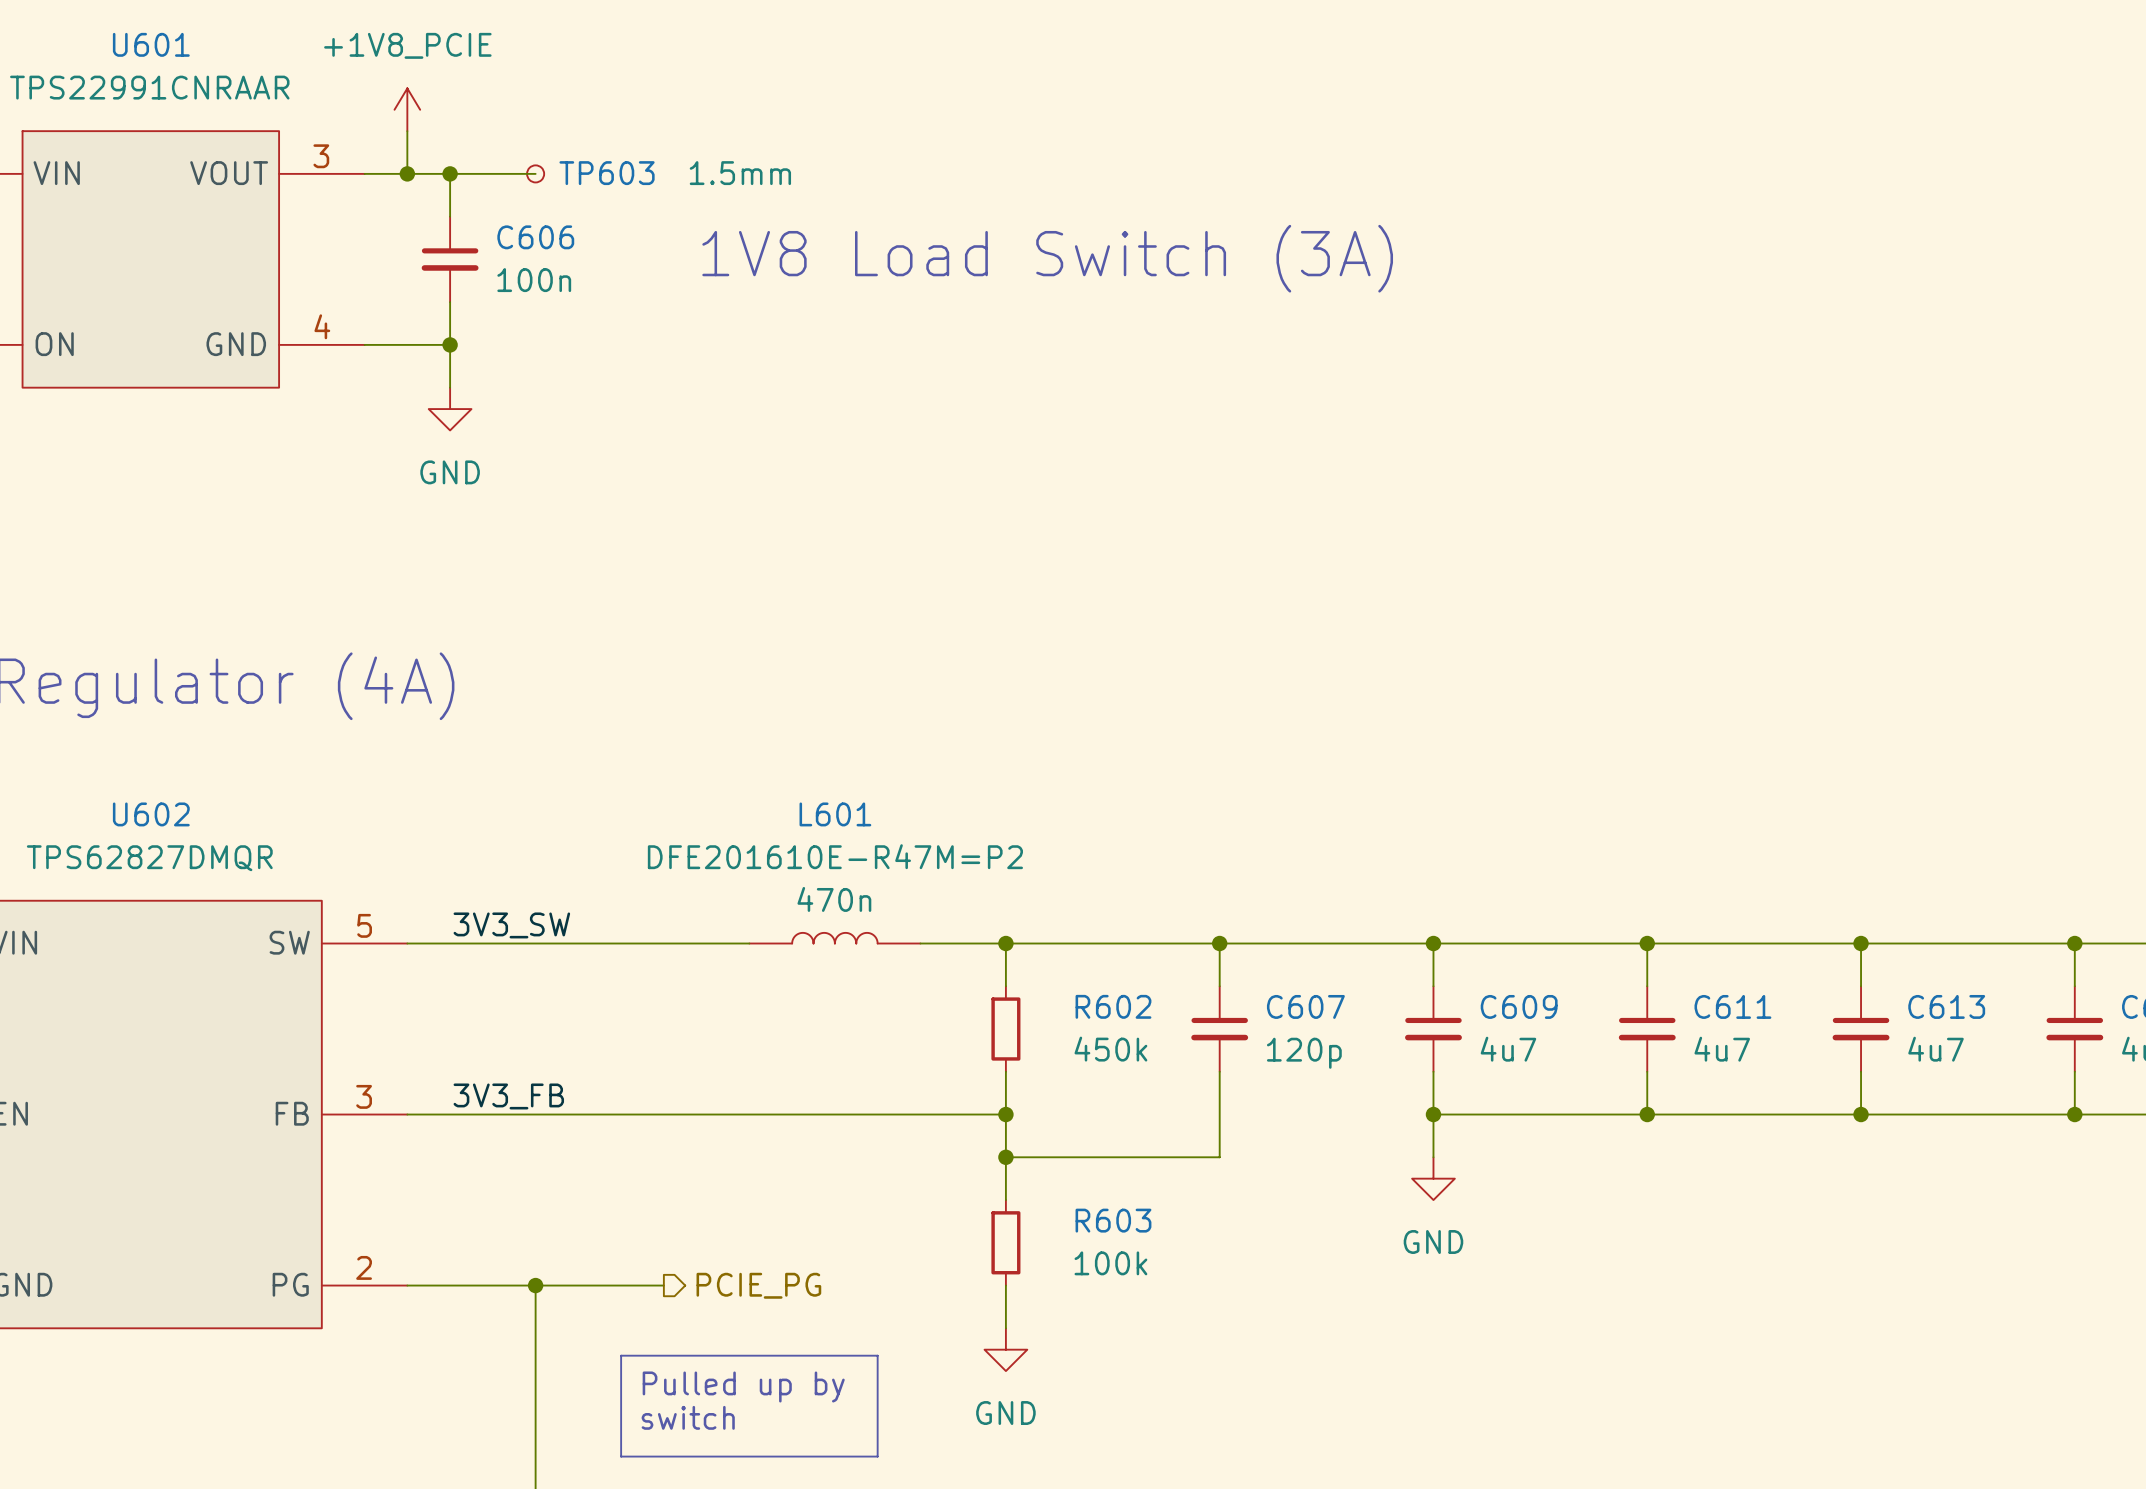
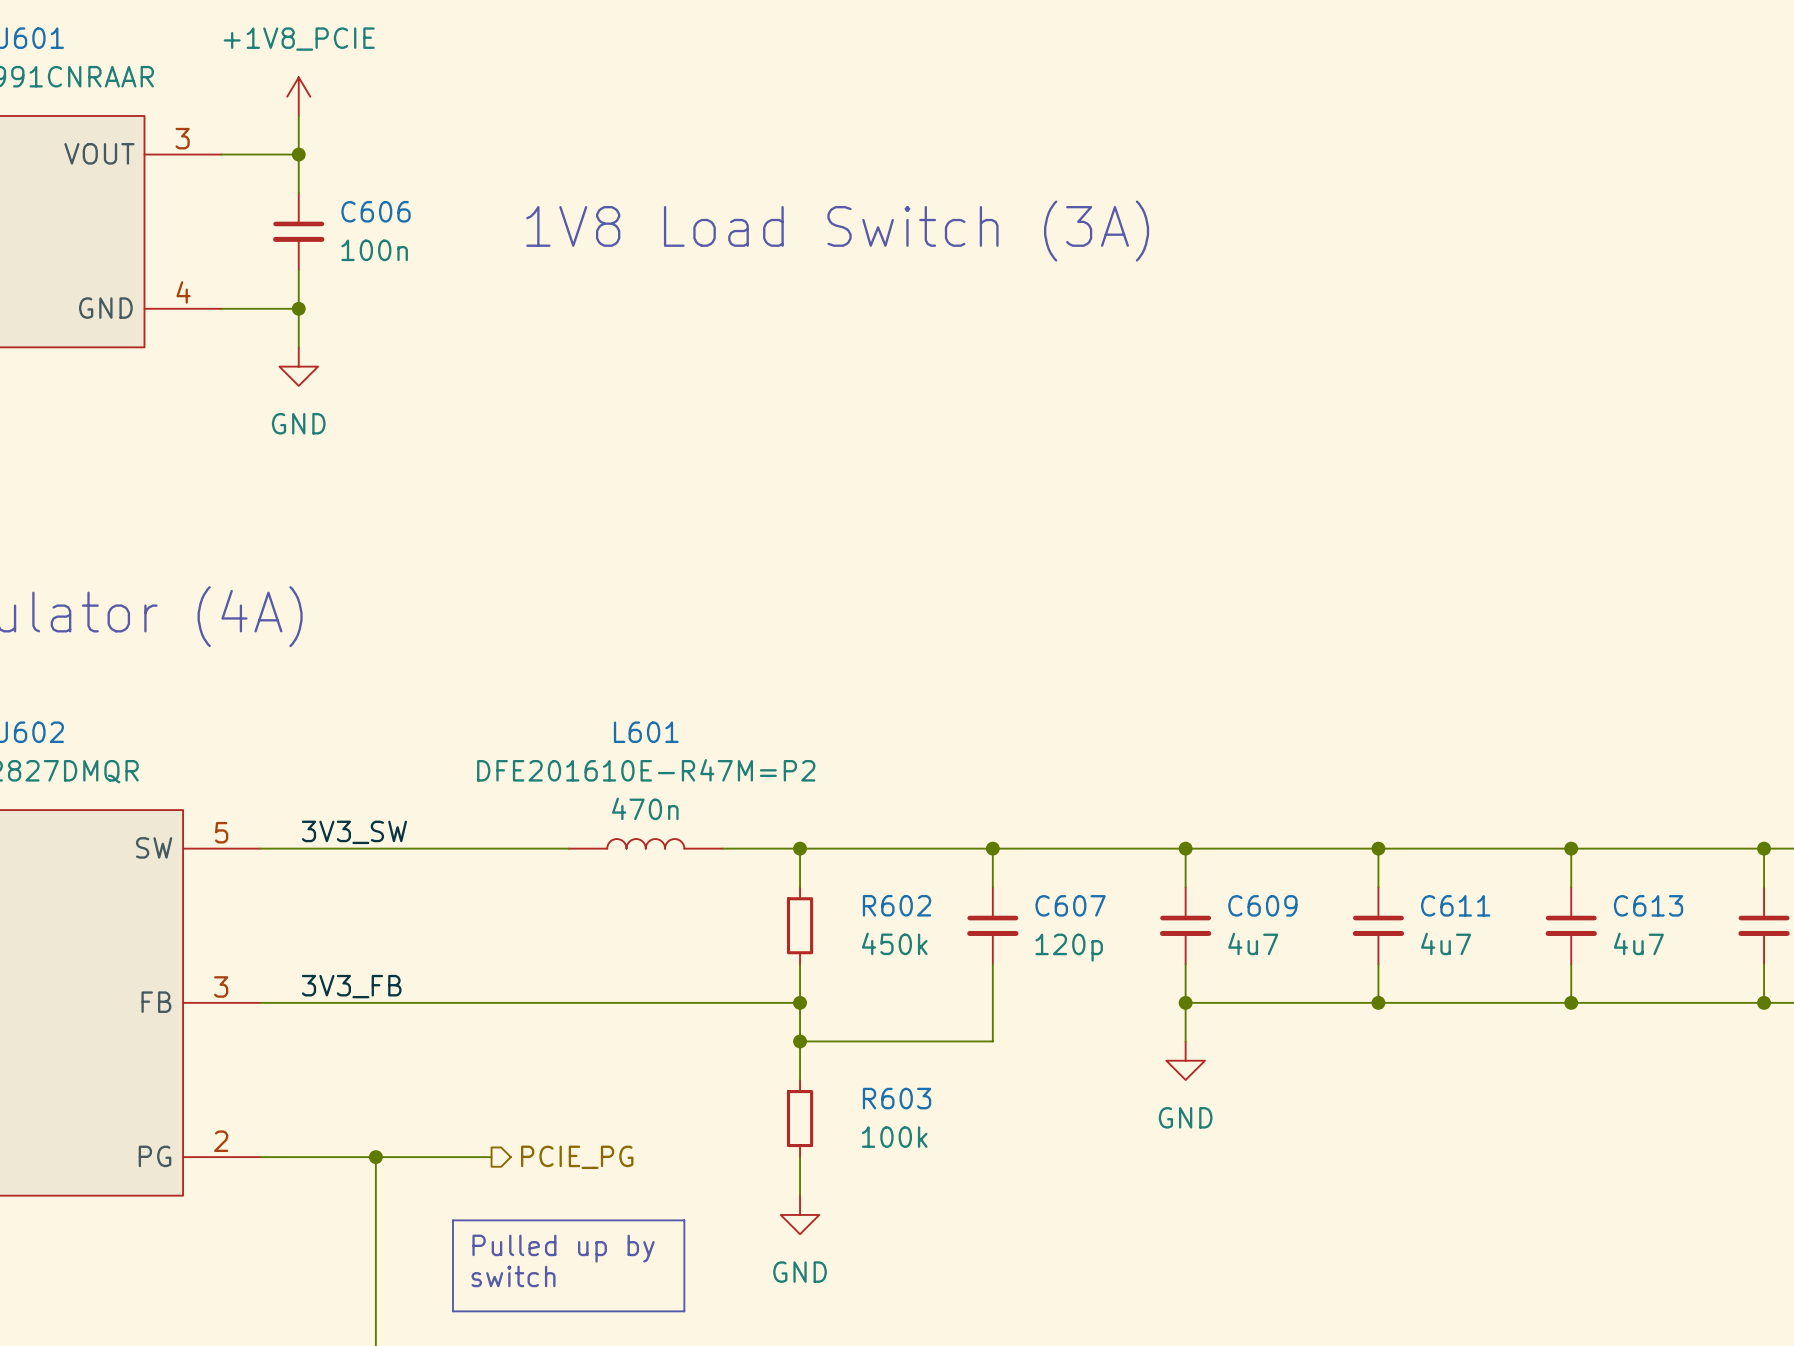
power symbol position: +1V8_PCIE (407, 109) -> +1V8_PCIE (298, 96)
wire: (407, 131) (407, 173) -> none
junction: (407, 173) -> none
wire: (450, 173) (535, 173) -> (298, 154) (298, 115)
TP603: 1.5mm (535, 173) -> none

